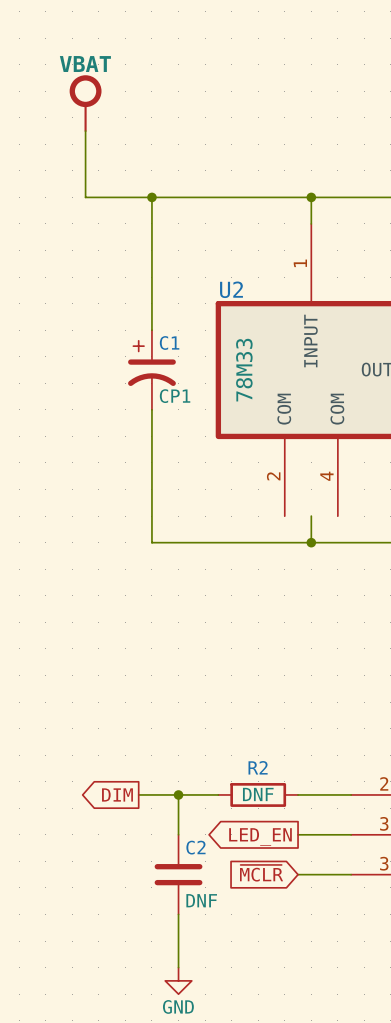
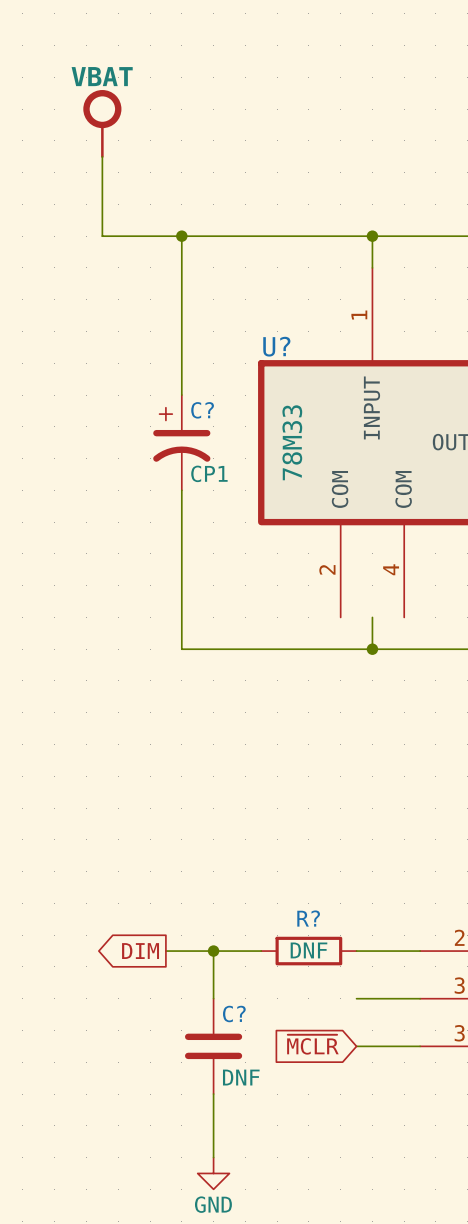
U2 name: U2 (231, 289) -> U? (276, 346)
C1 name: C1 (169, 342) -> C? (202, 410)
R2 name: R2 (258, 767) -> R? (308, 918)
global label: LED_EN (260, 836) -> none
C2 name: C2 (195, 847) -> C? (234, 1014)

